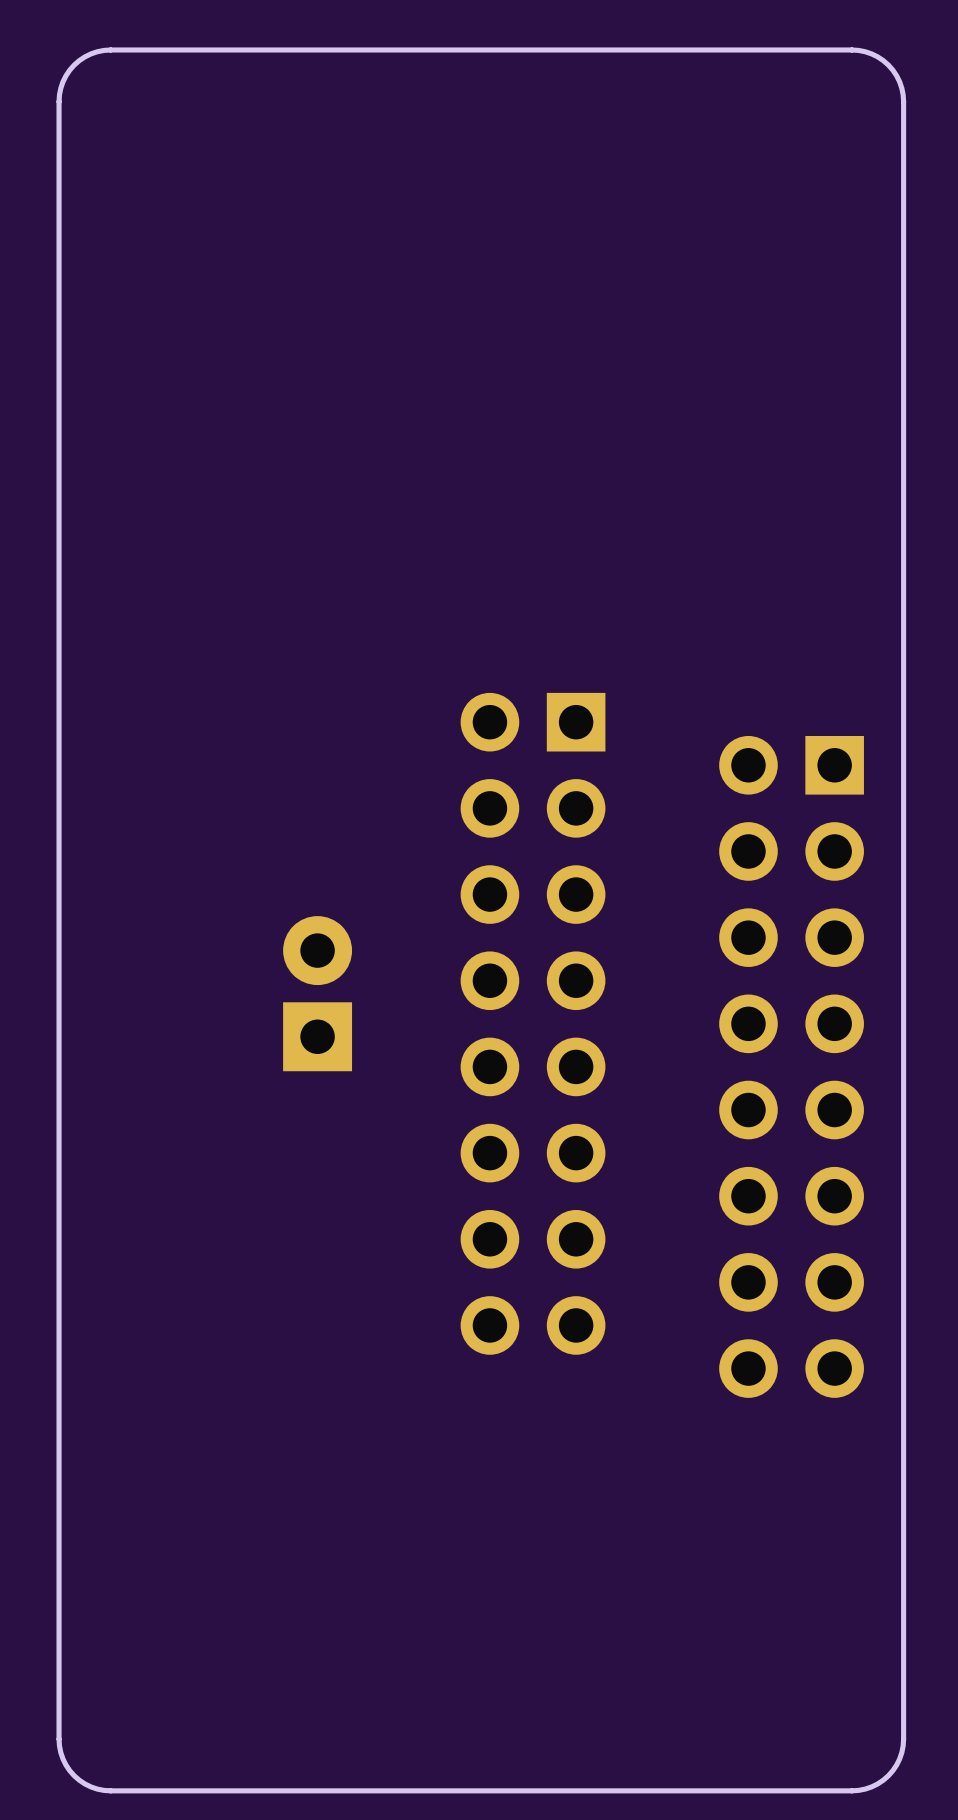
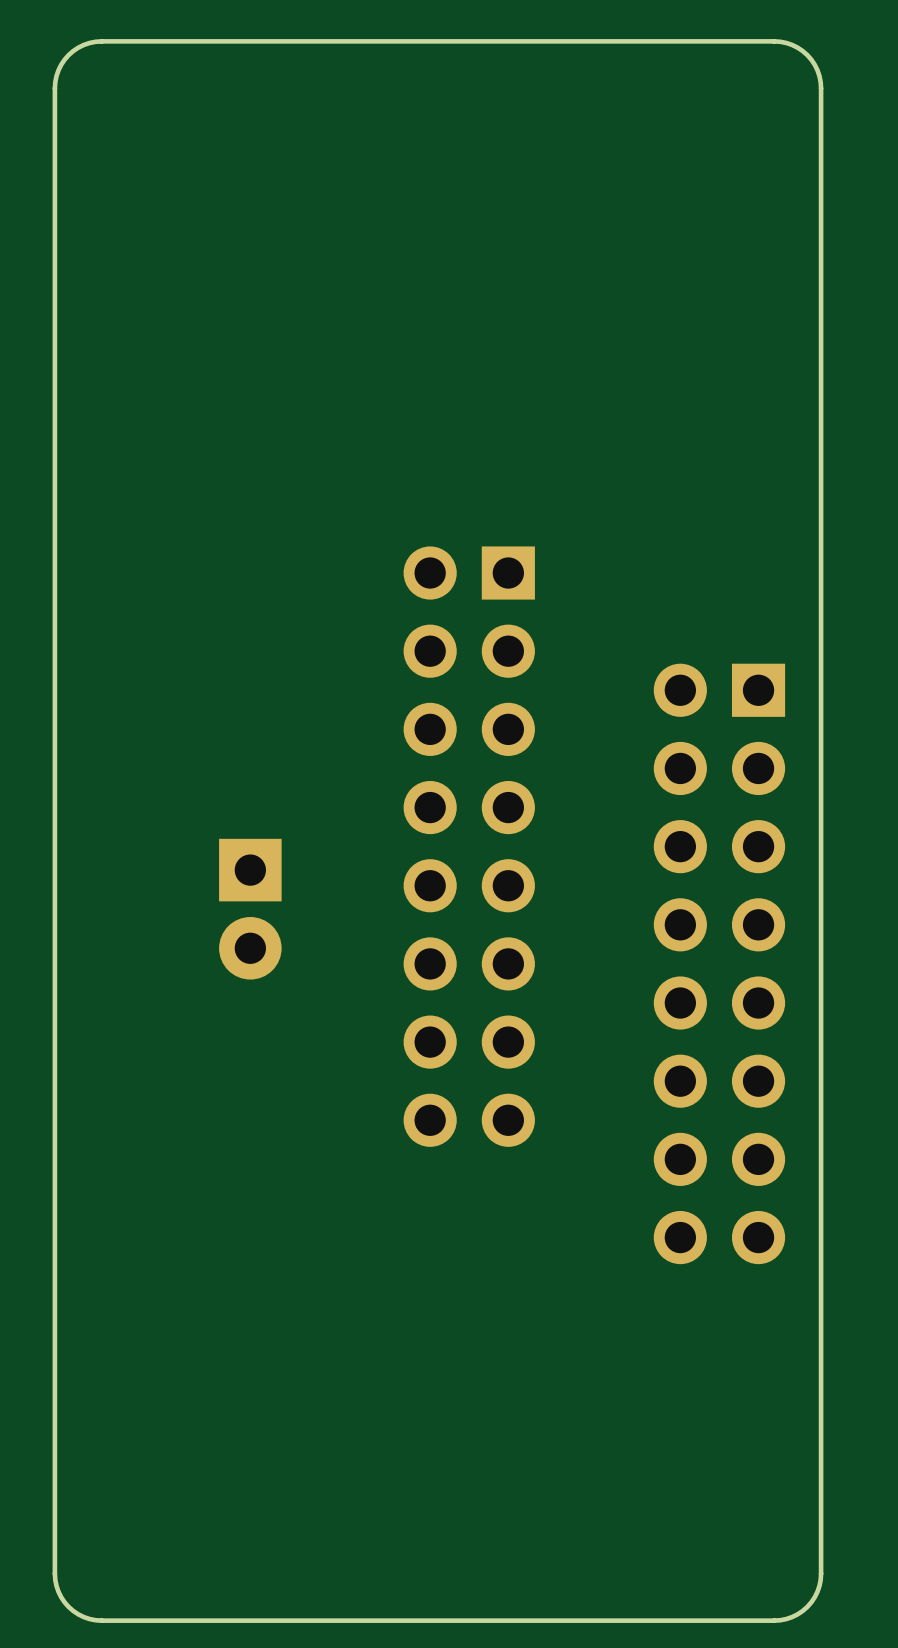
part rotation: 0° (317, 993) -> 180° (250, 909)
part position: (533, 1023) -> (469, 846)

